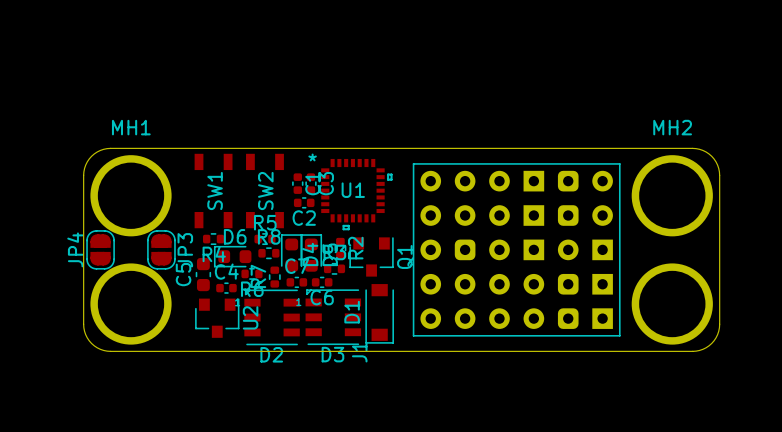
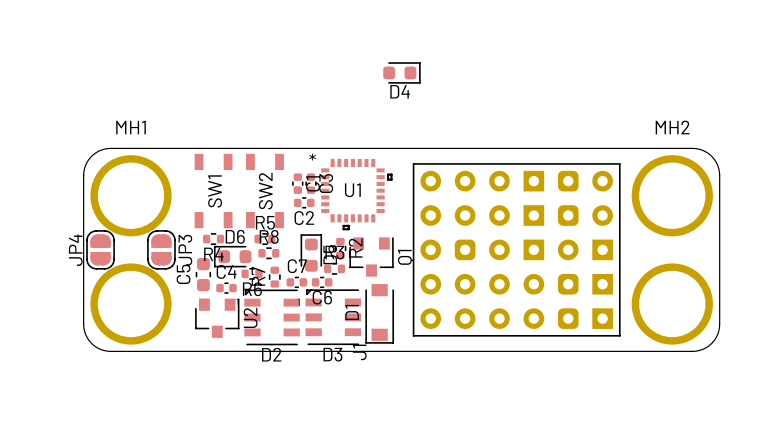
D4 rotation: 0° (291, 252) -> 90° clockwise (401, 72)
D4 position: (291, 252) -> (401, 72)

